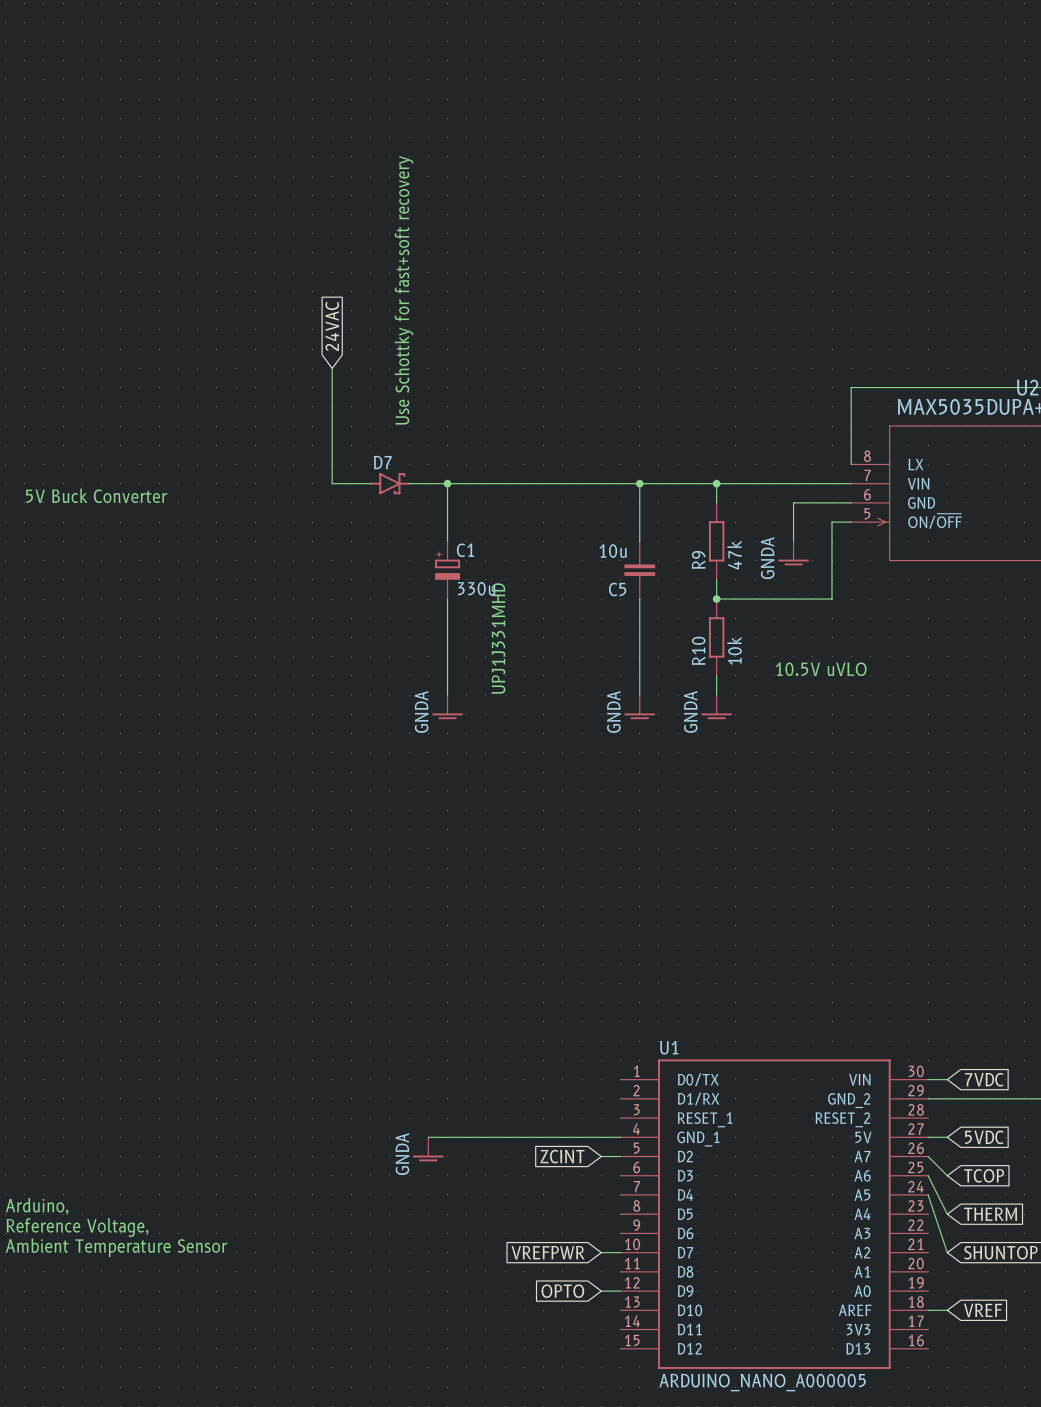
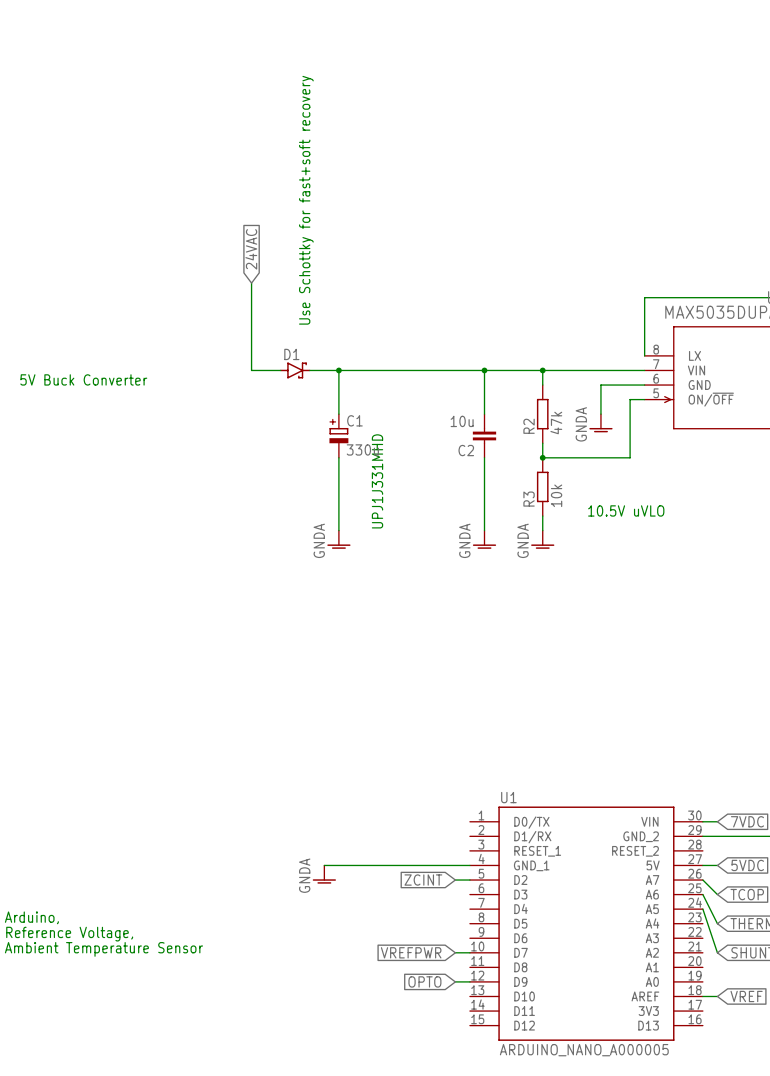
D7 name: D7 (382, 462) -> D1 (291, 354)
R9 name: R9 (698, 559) -> R2 (529, 426)
C5 name: C5 (617, 589) -> C2 (466, 450)
R10 name: R10 (698, 650) -> R3 (529, 499)

